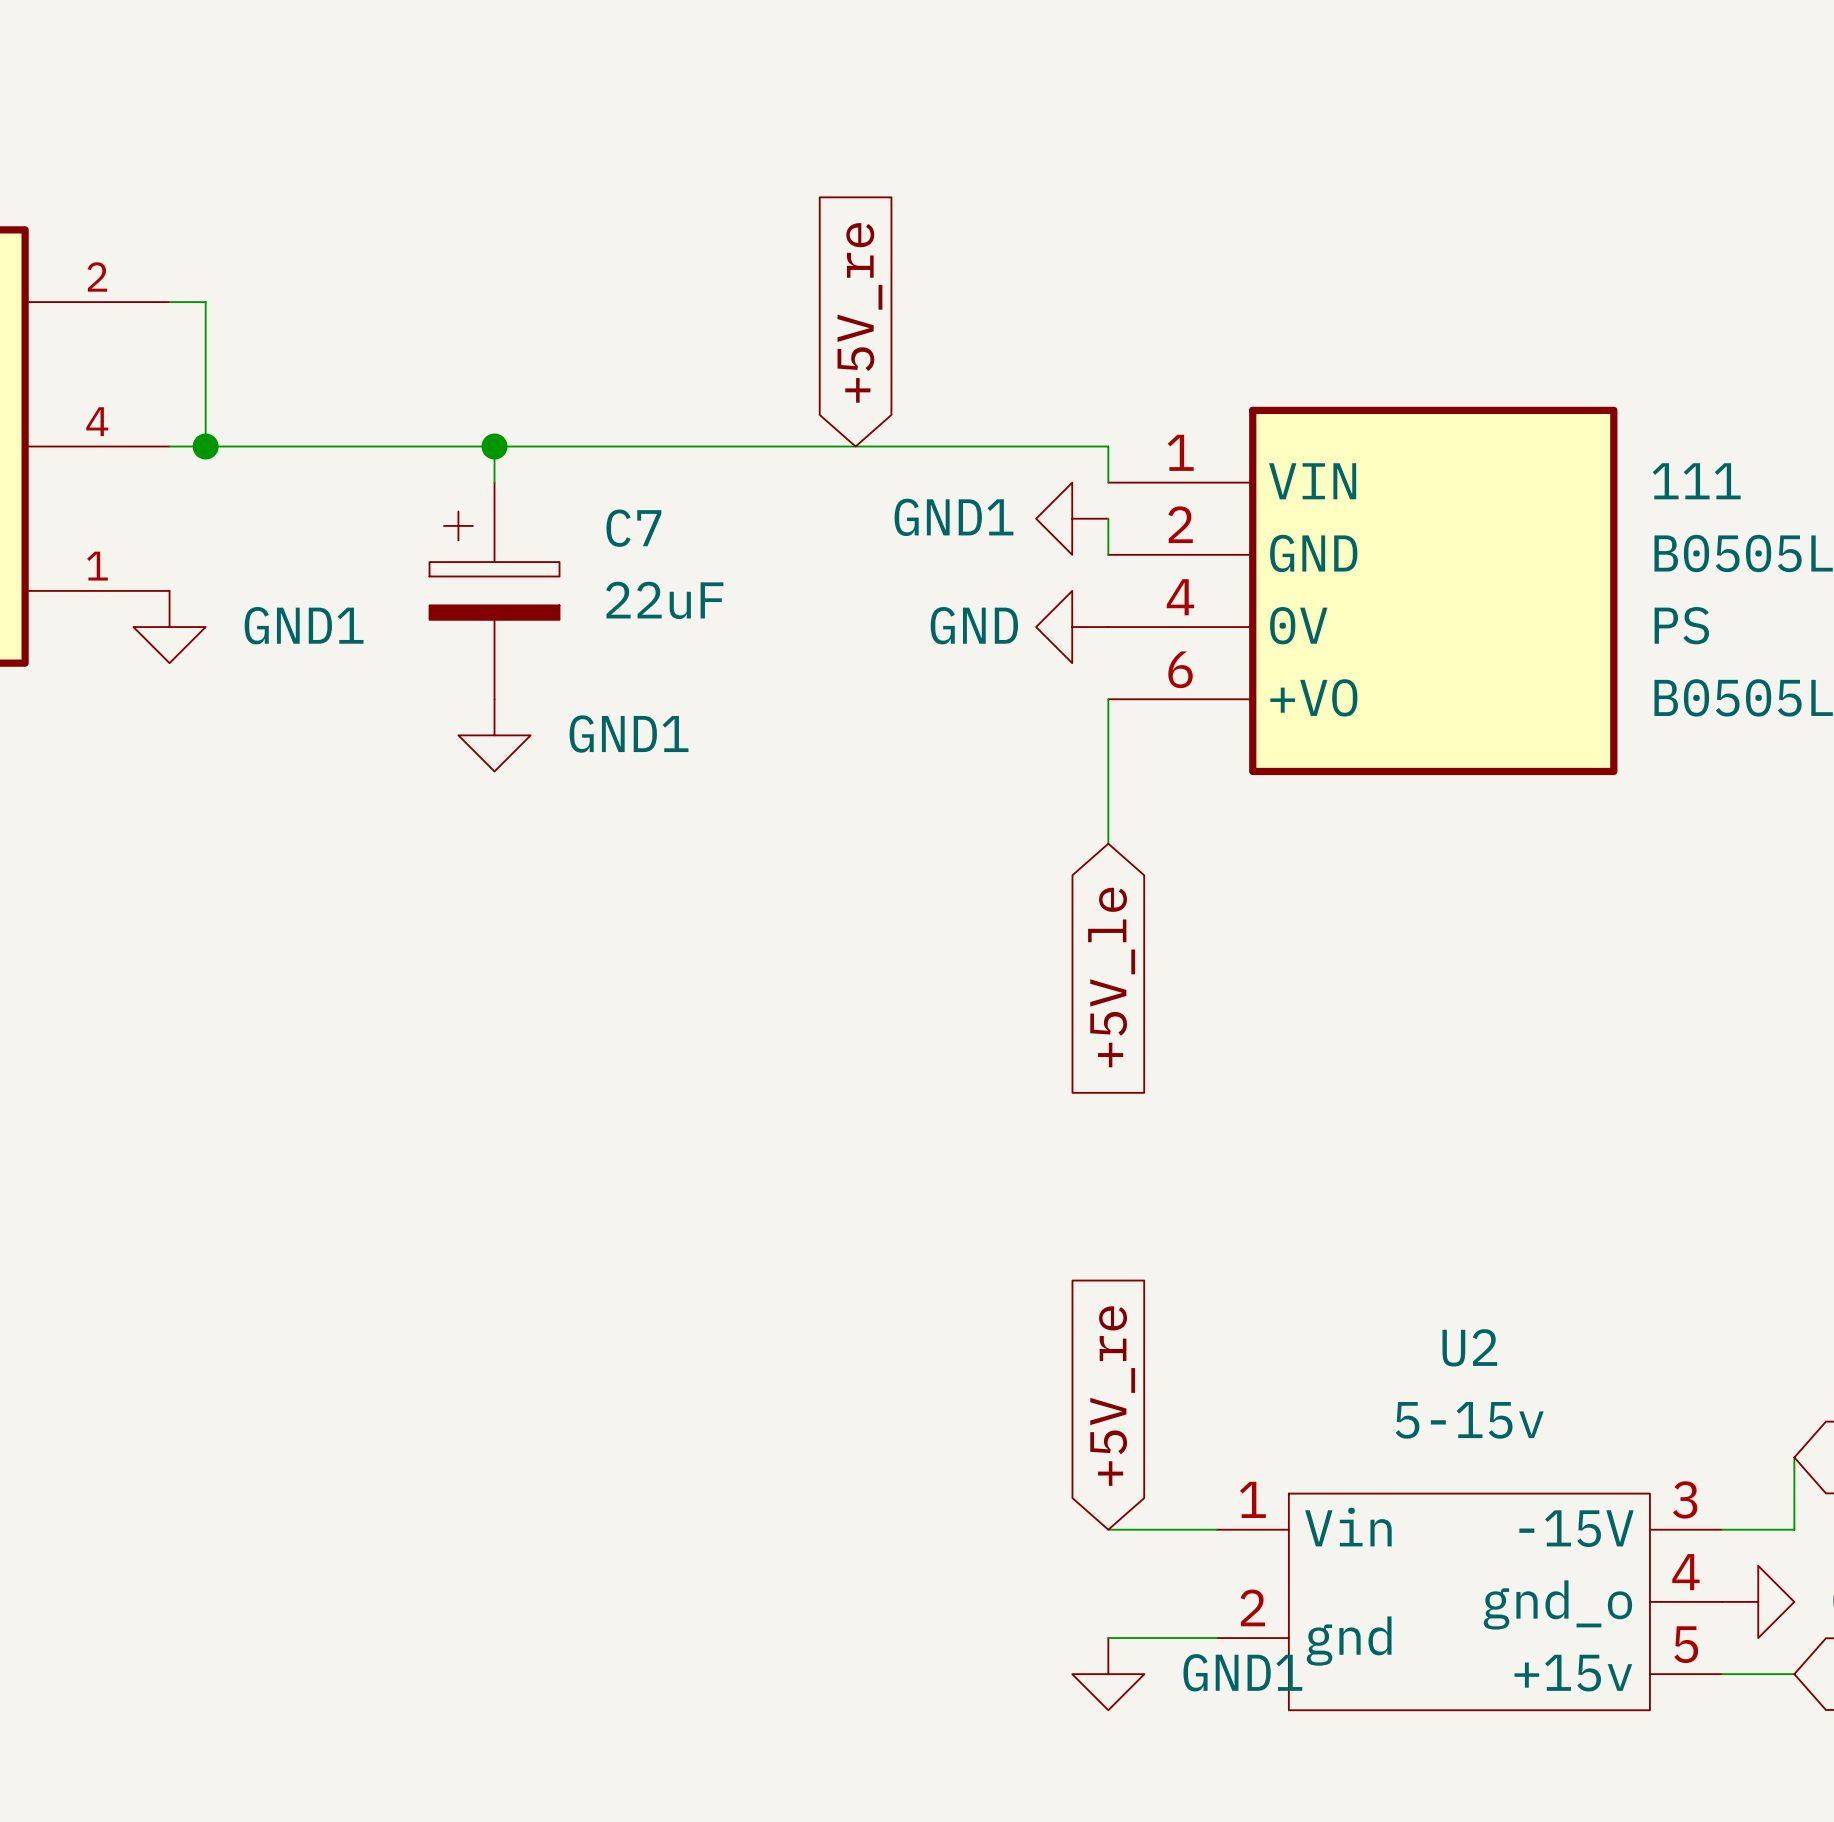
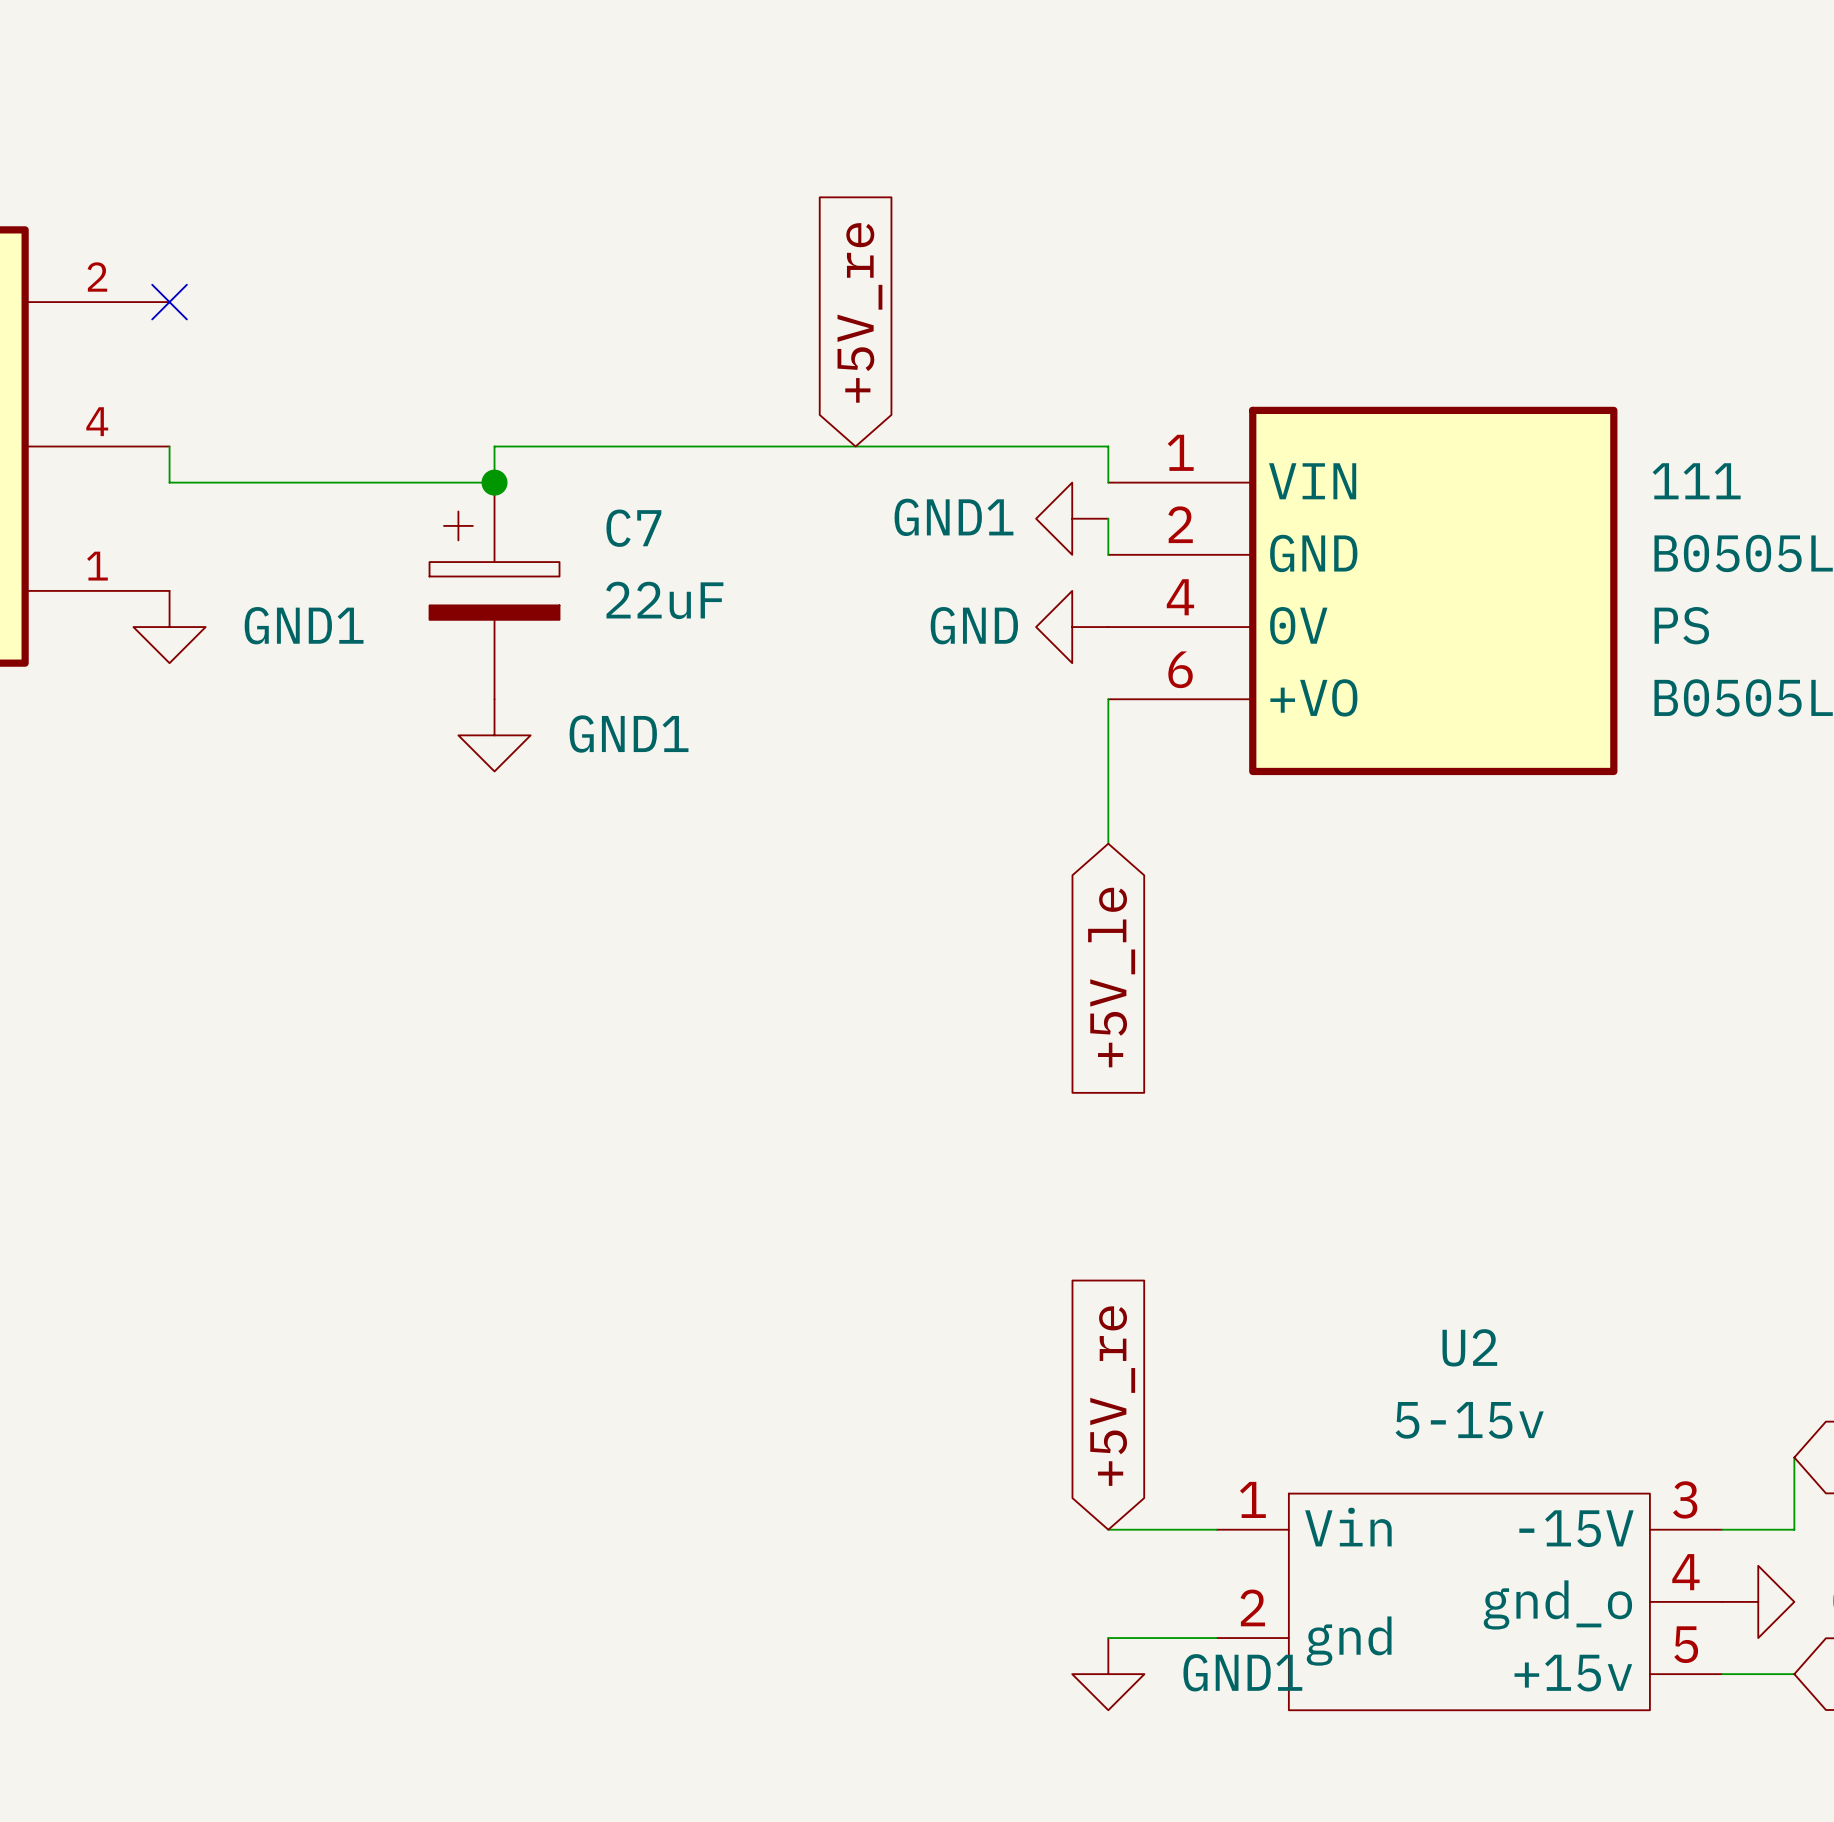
wire: (169, 302) (205, 302) (205, 446) -> none
no-connect mark: none -> (169, 302)
wire: (169, 446) (494, 446) -> (169, 446) (169, 482) (494, 482)
junction: (205, 446) -> none
junction position: (494, 446) -> (494, 482)

